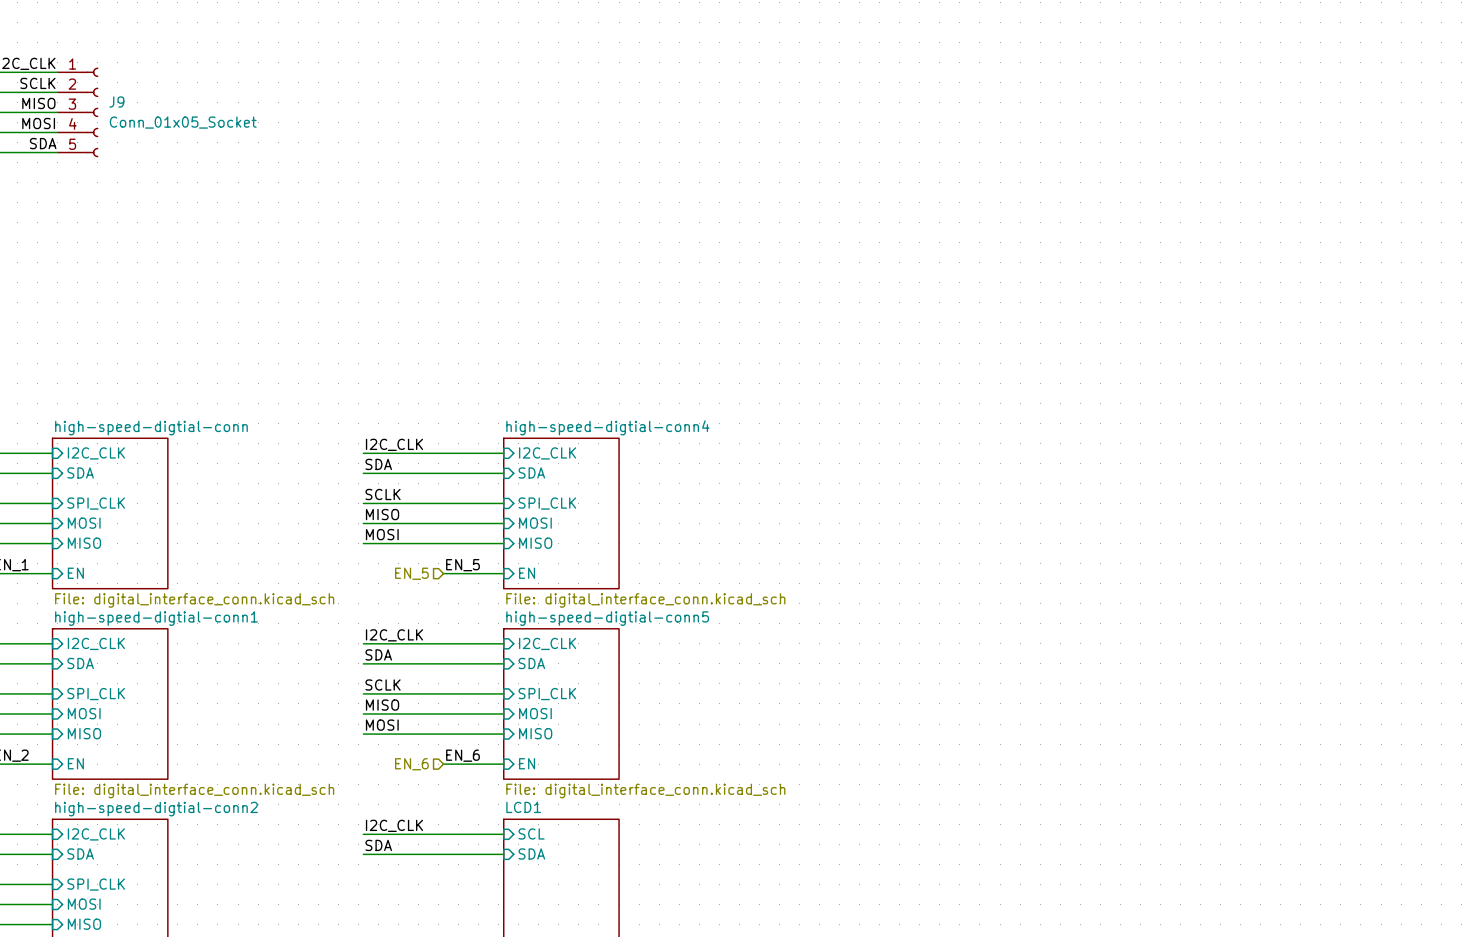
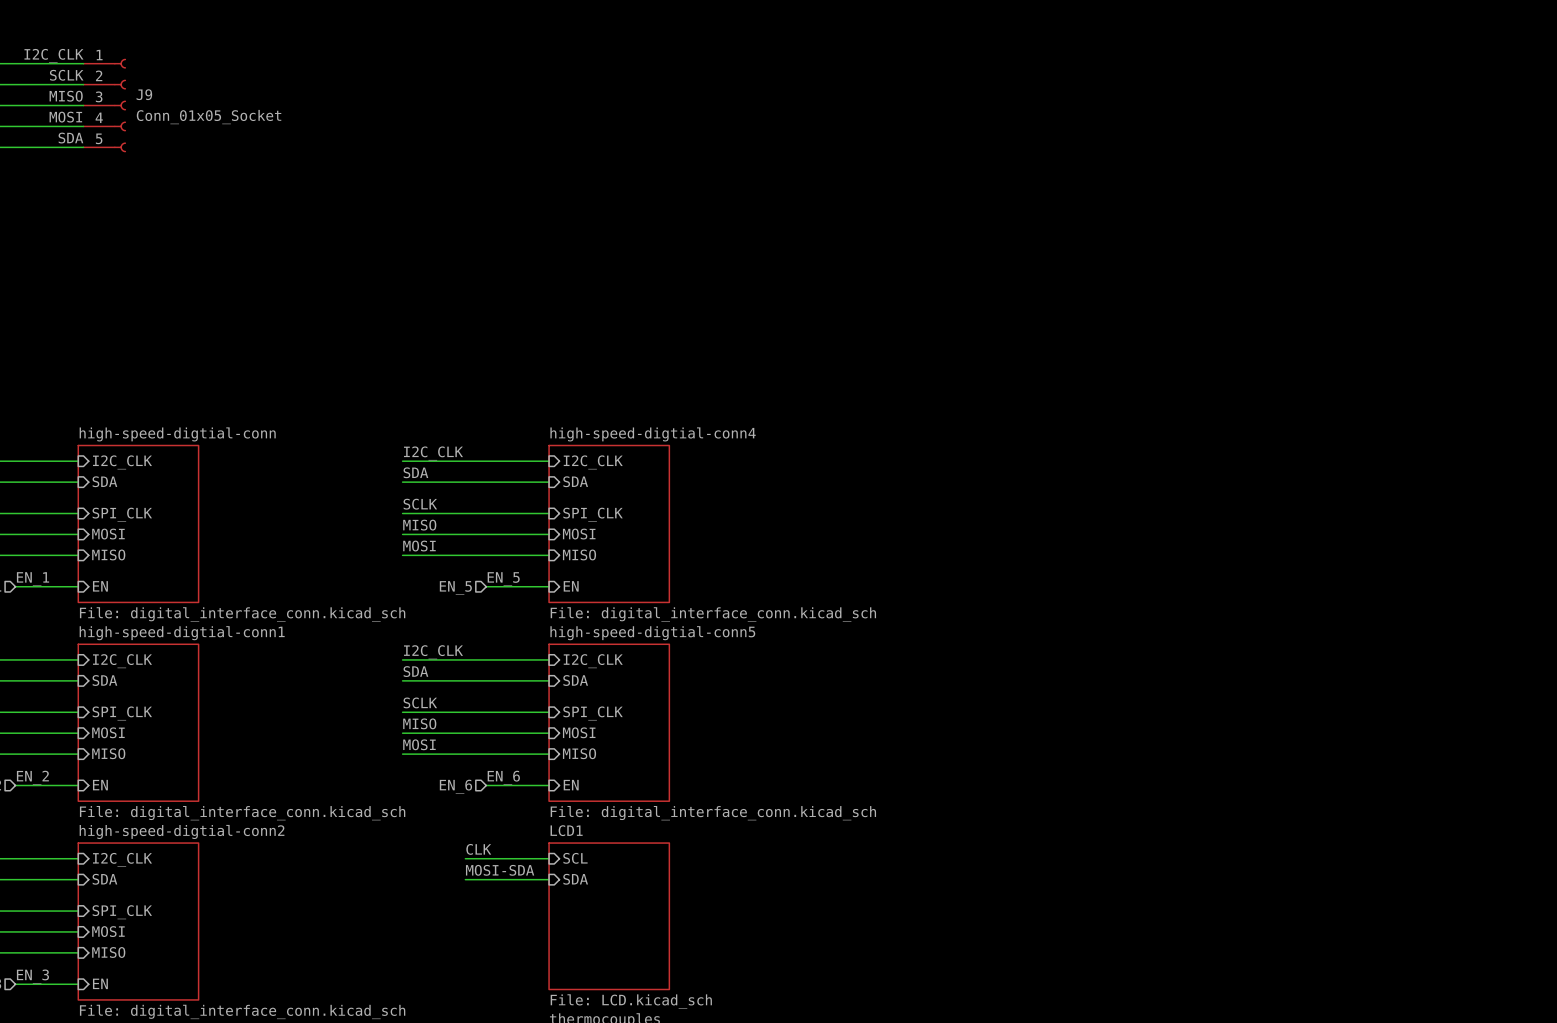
label: I2C_CLK (394, 825) -> none
label: none -> CLK (478, 849)
wire: (363, 834) (423, 834) -> none
label: SDA (378, 845) -> none
label: none -> MOSI-SDA (500, 870)
wire: (363, 854) (423, 854) -> none

